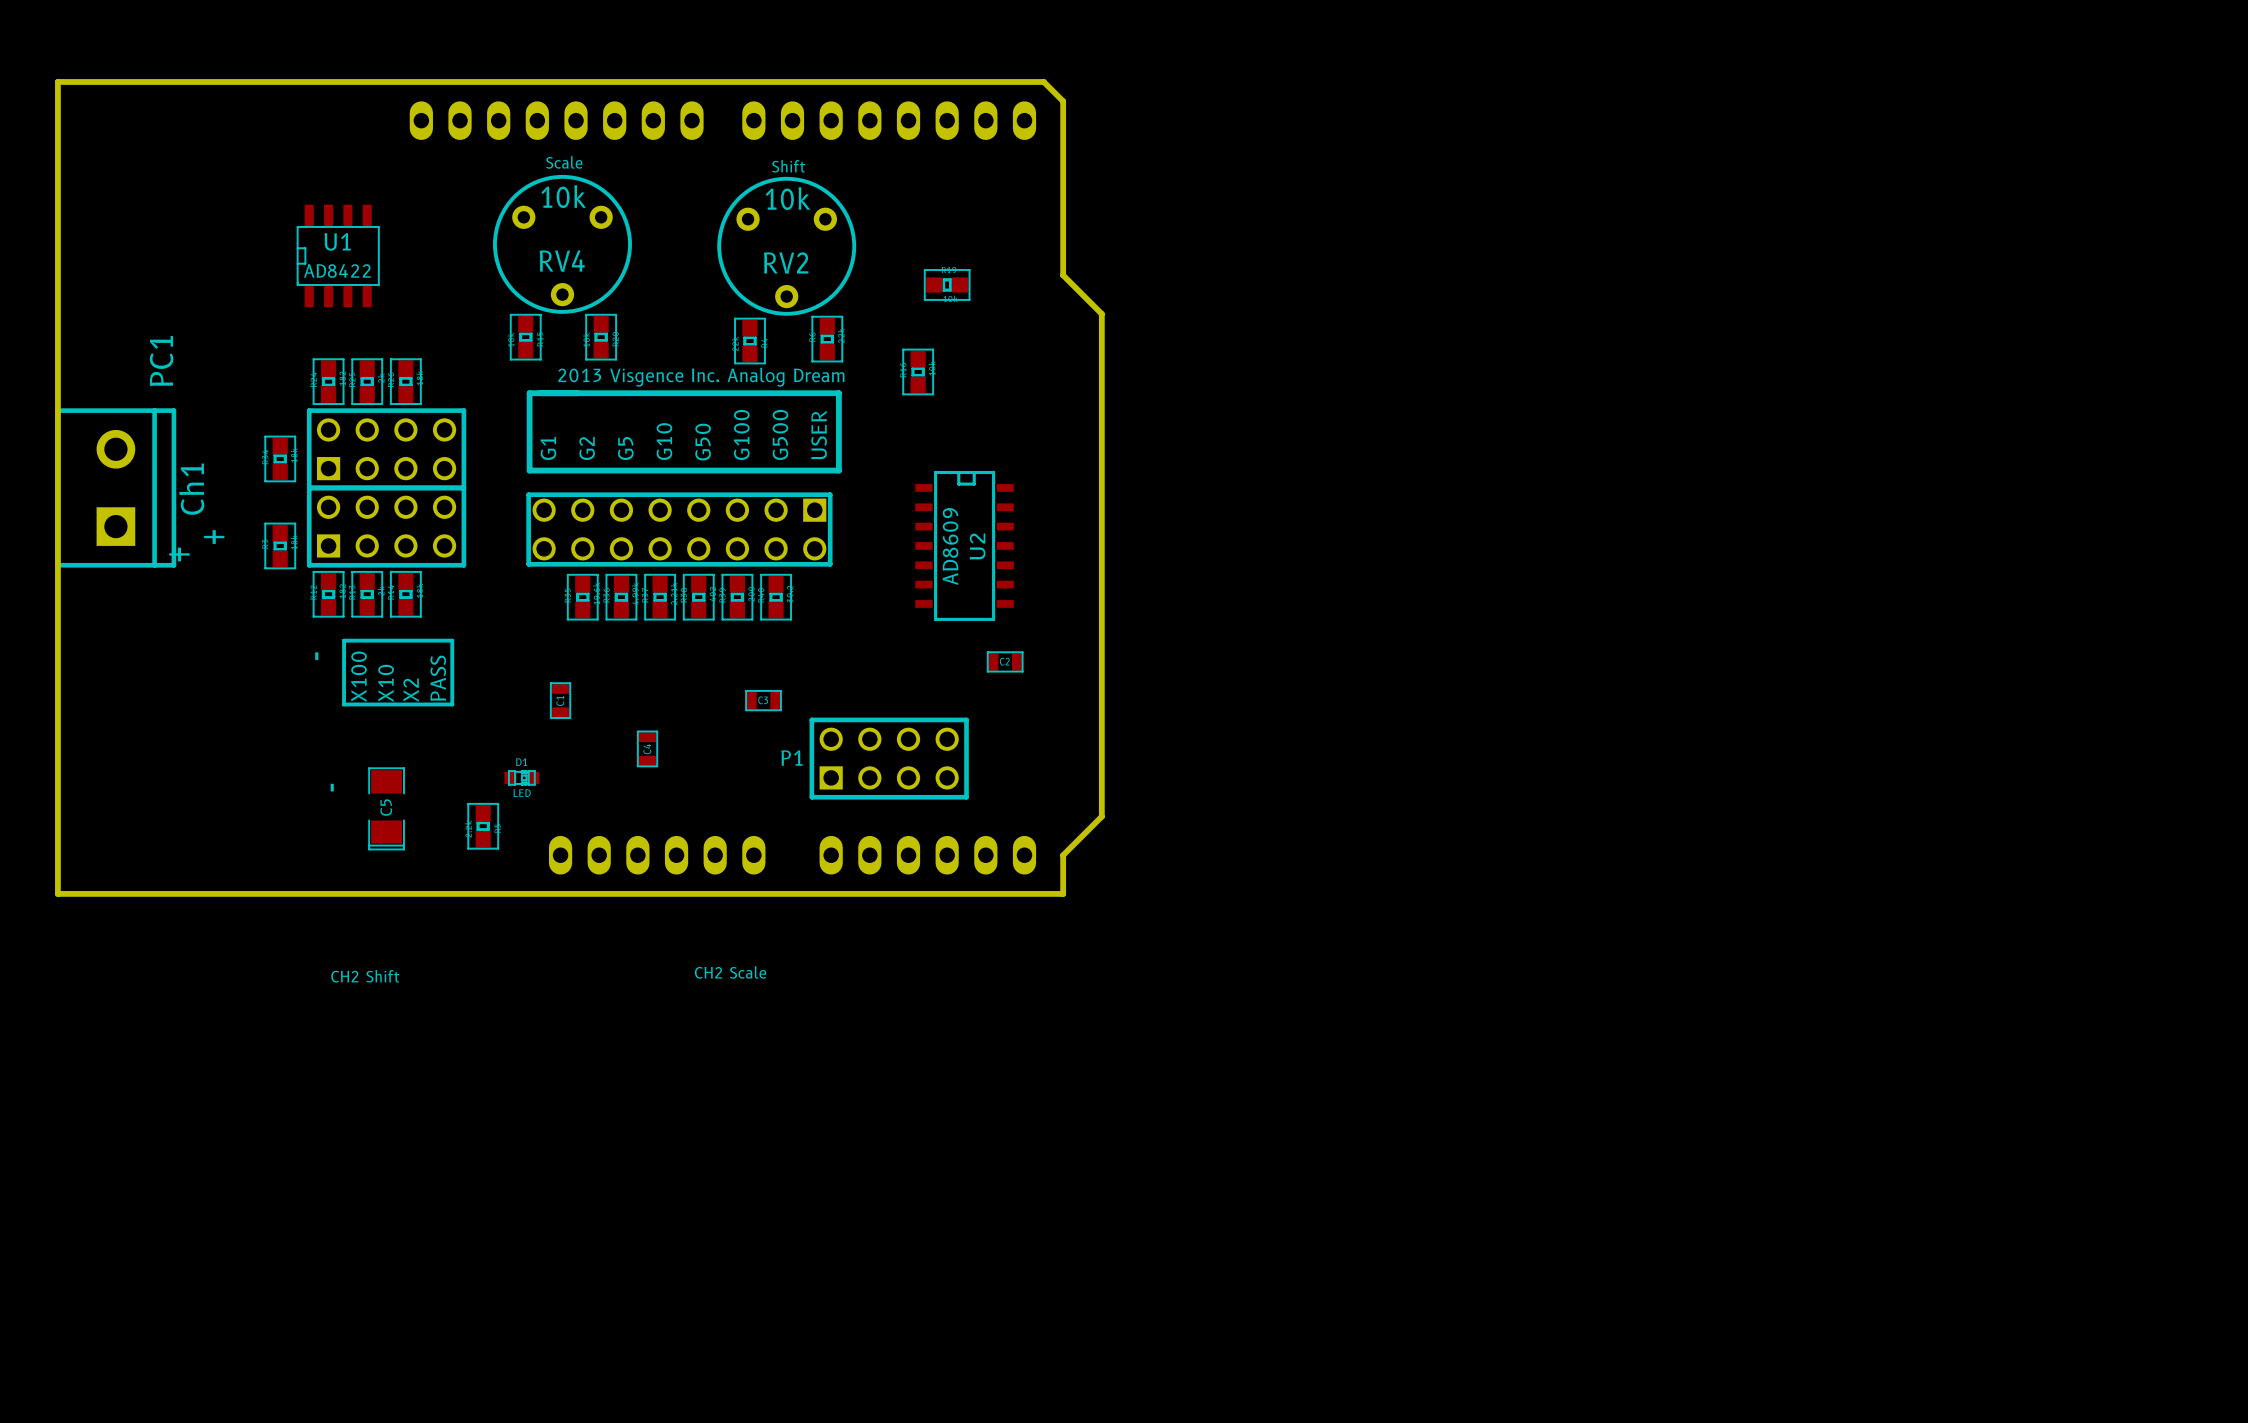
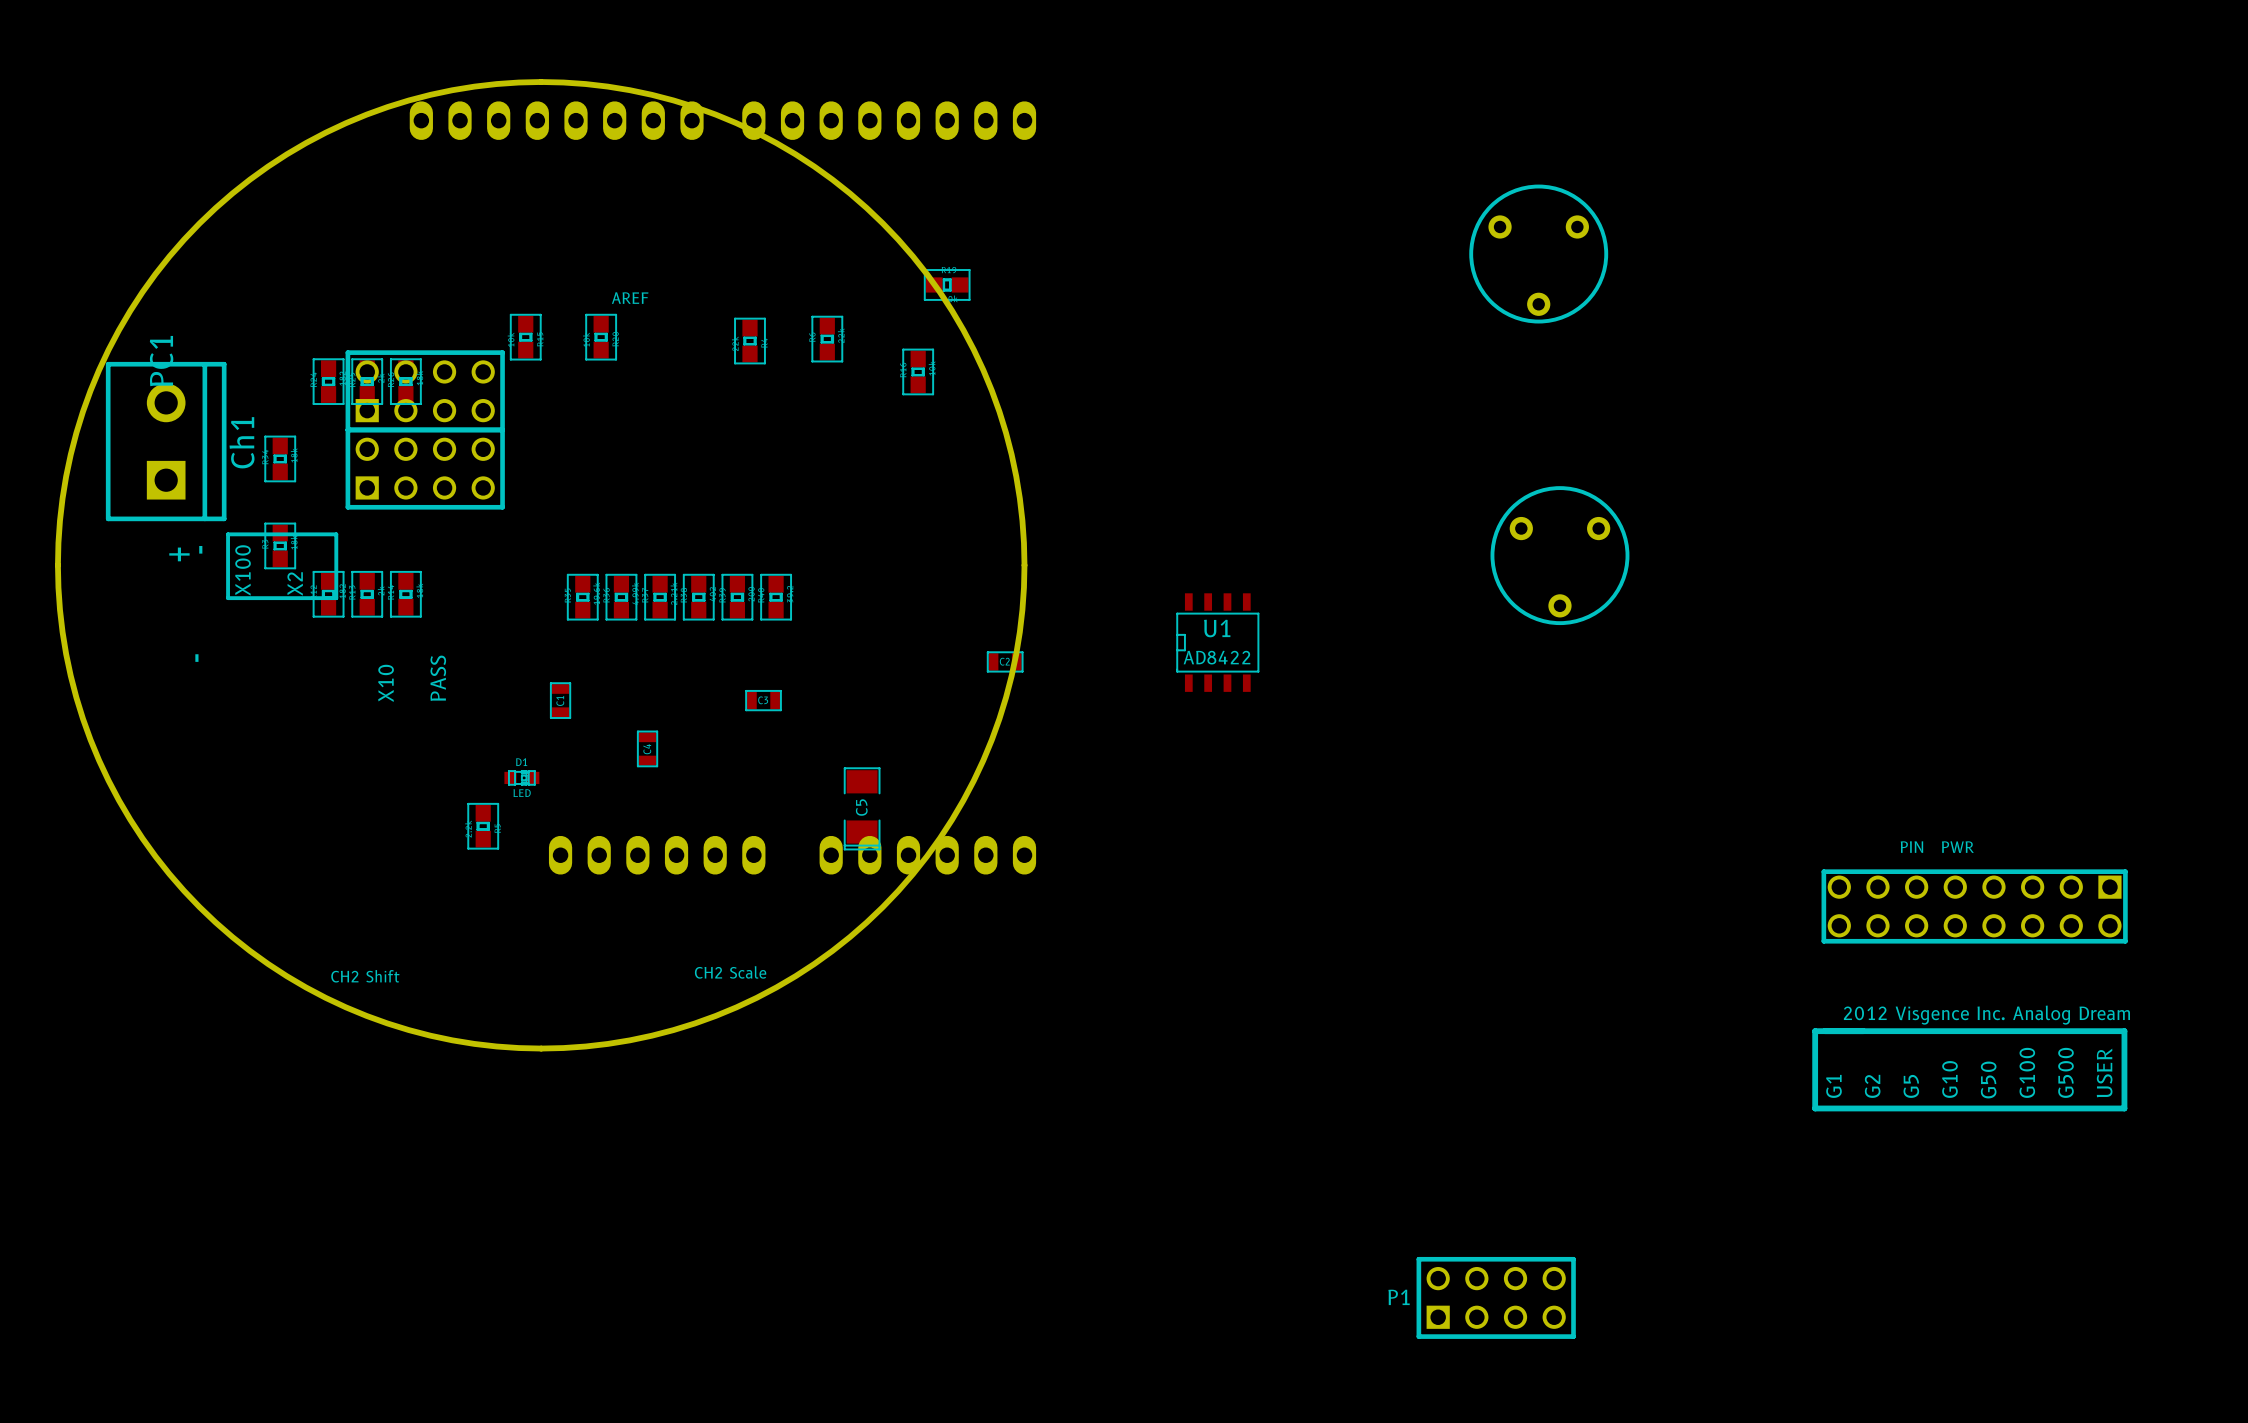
board edge: (57, 81) (57, 893) (1063, 893) (1063, 855) (1101, 816) (1101, 313) (1063, 275) (1063, 101) (1043, 81) (57, 81) -> (541, 81) (496, 84) (452, 90) (387, 107) (346, 123) (306, 143) (268, 166) (232, 193) (199, 223) (155, 274) (130, 310) (108, 349) (90, 390) (76, 433) (66, 476) (59, 520) (57, 565) (59, 609) (66, 654) (76, 697) (99, 760) (119, 800) (142, 838) (169, 874) (199, 907) (232, 937) (268, 963) (306, 987) (366, 1015) (408, 1030) (452, 1040) (496, 1046) (541, 1048) (585, 1046) (630, 1040) (673, 1030) (715, 1015) (776, 987) (814, 963) (849, 937) (882, 907) (913, 874) (939, 838) (963, 800) (991, 739) (1006, 697) (1016, 654) (1022, 609) (1024, 565) (1022, 520) (1016, 476) (1006, 433) (983, 370) (963, 330) (939, 292) (913, 256) (882, 223) (832, 179) (795, 154) (756, 132) (715, 114) (673, 100) (630, 90) (585, 84) (541, 81)
text: Scale (564, 162) -> none
text: Shift (788, 166) -> none
U1 footprint: [296, 204, 380, 308] -> [1176, 593, 1260, 692]
RV4: 10k (562, 244) -> none
RV2: 10k (786, 246) -> none
part: none -> (1538, 254)
text: none -> AREF (630, 298)
text: 2013 Visgence Inc. Analog Dream (701, 377) -> none
part: none -> (425, 391)
line: (529, 393) (838, 393) (838, 470) (529, 470) (529, 393) -> none
text: G100 (741, 434) -> none
text: G500 (780, 434) -> none
text: USER (819, 435) -> none
text: G10 (664, 441) -> none
text: G50 (703, 442) -> none
text: G1 (548, 448) -> none
text: G2 (587, 448) -> none
text: G5 (625, 448) -> none
part: (386, 449) -> none
part: none -> (425, 468)
PC1 position: (115, 487) -> (166, 441)
part: (386, 526) -> none
part: (679, 529) -> none
text: + (214, 537) -> none
U2: AD8609 (964, 545) -> none
text: none -> - (200, 549)
part: none -> (1559, 555)
line: (344, 640) (452, 640) (452, 704) (344, 704) (344, 640) -> (228, 534) (336, 534) (336, 598) (228, 598) (228, 534)
text: - (316, 656) -> none
text: none -> - (196, 658)
text position: X100 (359, 676) -> X100 (243, 570)
text position: X2 (411, 690) -> X2 (295, 583)
P1 position: (889, 758) -> (1496, 1297)
text: - (332, 787) -> none
C5 position: (386, 808) -> (862, 808)
text: none -> PIN PWR (1937, 847)
part: none -> (1974, 906)
text: none -> 2012 Visgence Inc. Analog Dream (1986, 1015)
line: none -> (1815, 1031) (2124, 1031) (2124, 1108) (1815, 1108) (1815, 1031)
text: none -> G100 (2027, 1072)
text: none -> G500 (2065, 1072)
text: none -> USER (2104, 1072)
text: none -> G10 (1949, 1079)
text: none -> G50 (1988, 1080)
text: none -> G1 (1833, 1086)
text: none -> G2 (1872, 1086)
text: none -> G5 (1911, 1086)

